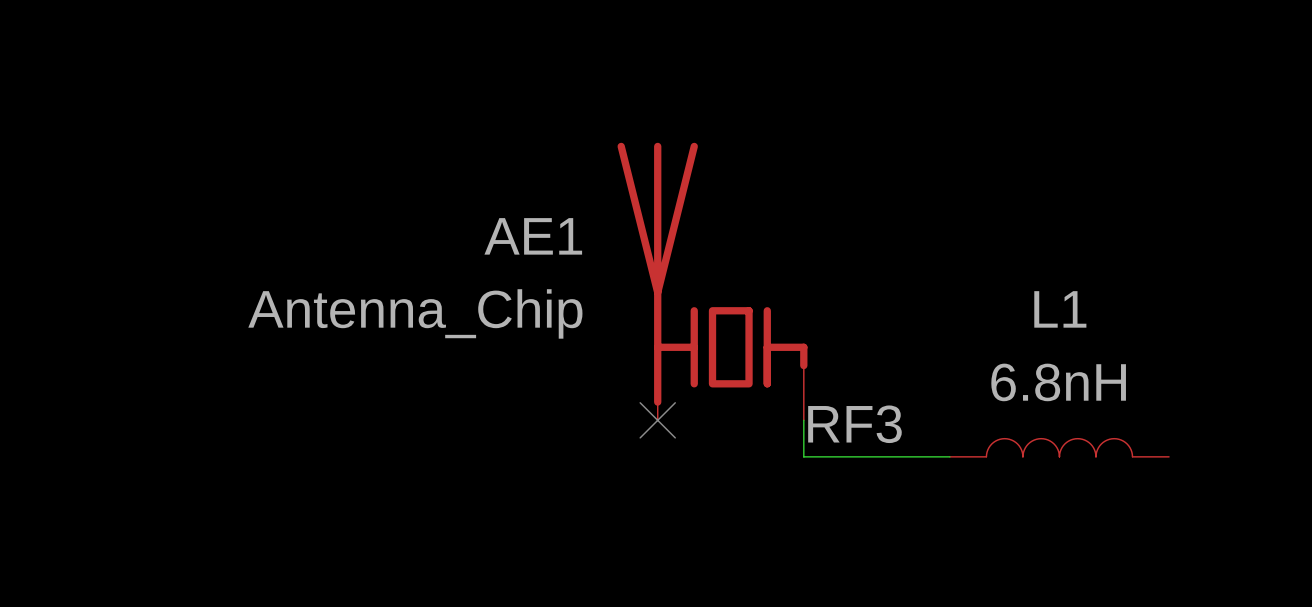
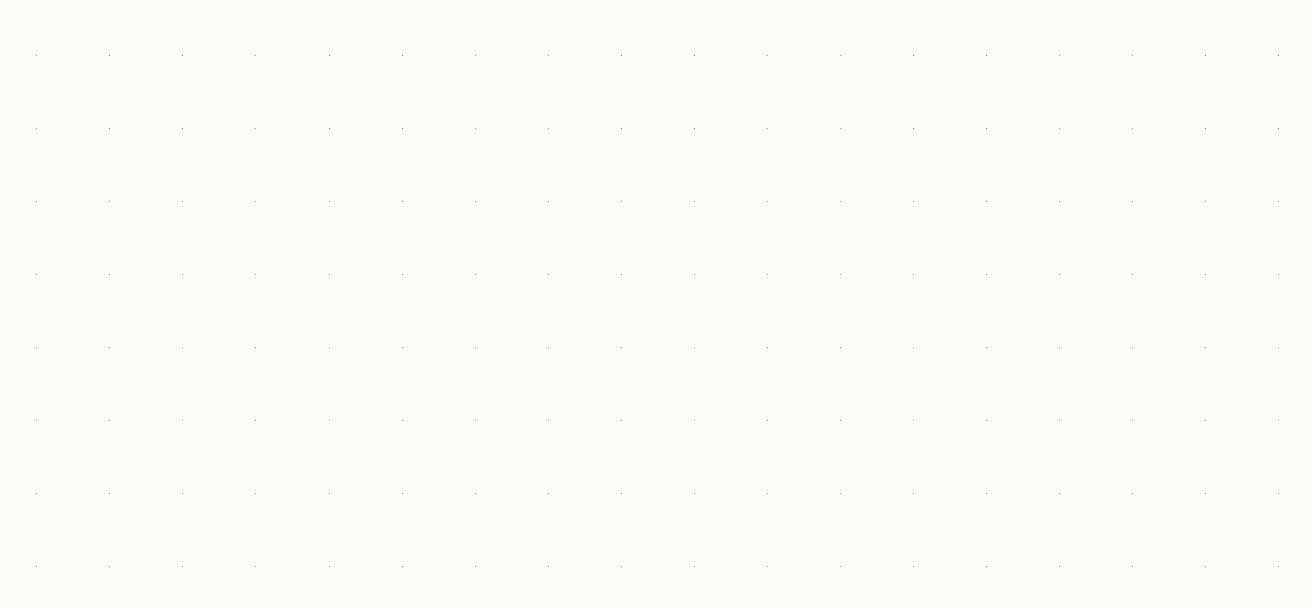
AE1: Antenna_Chip (712, 281) -> none
no-connect mark: (657, 420) -> none
wire: (803, 420) (803, 456) (949, 456) -> none
label: RF3 (854, 424) -> none
L1: 6.8nH (1059, 447) -> none

